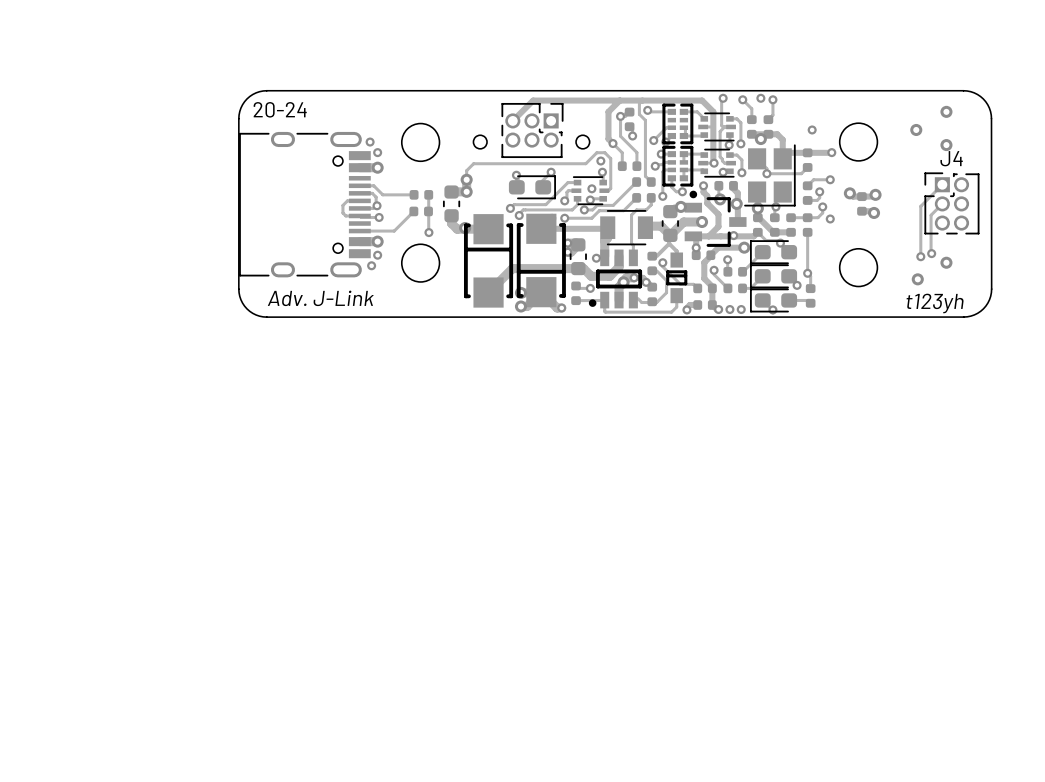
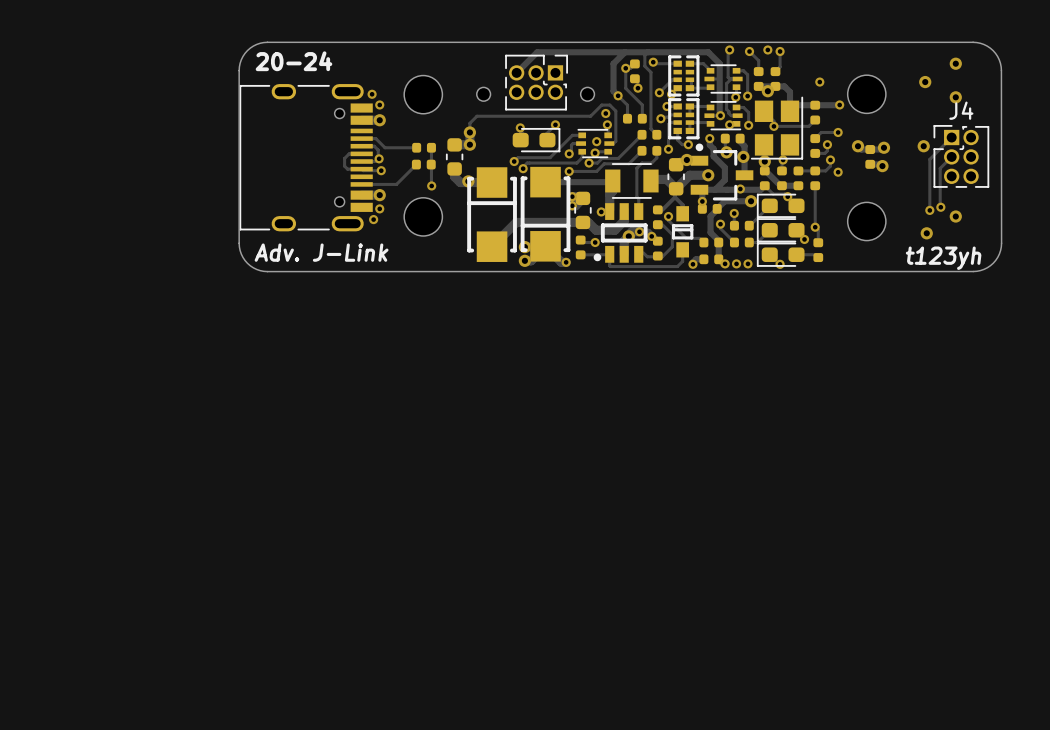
via: none -> (923, 146)

